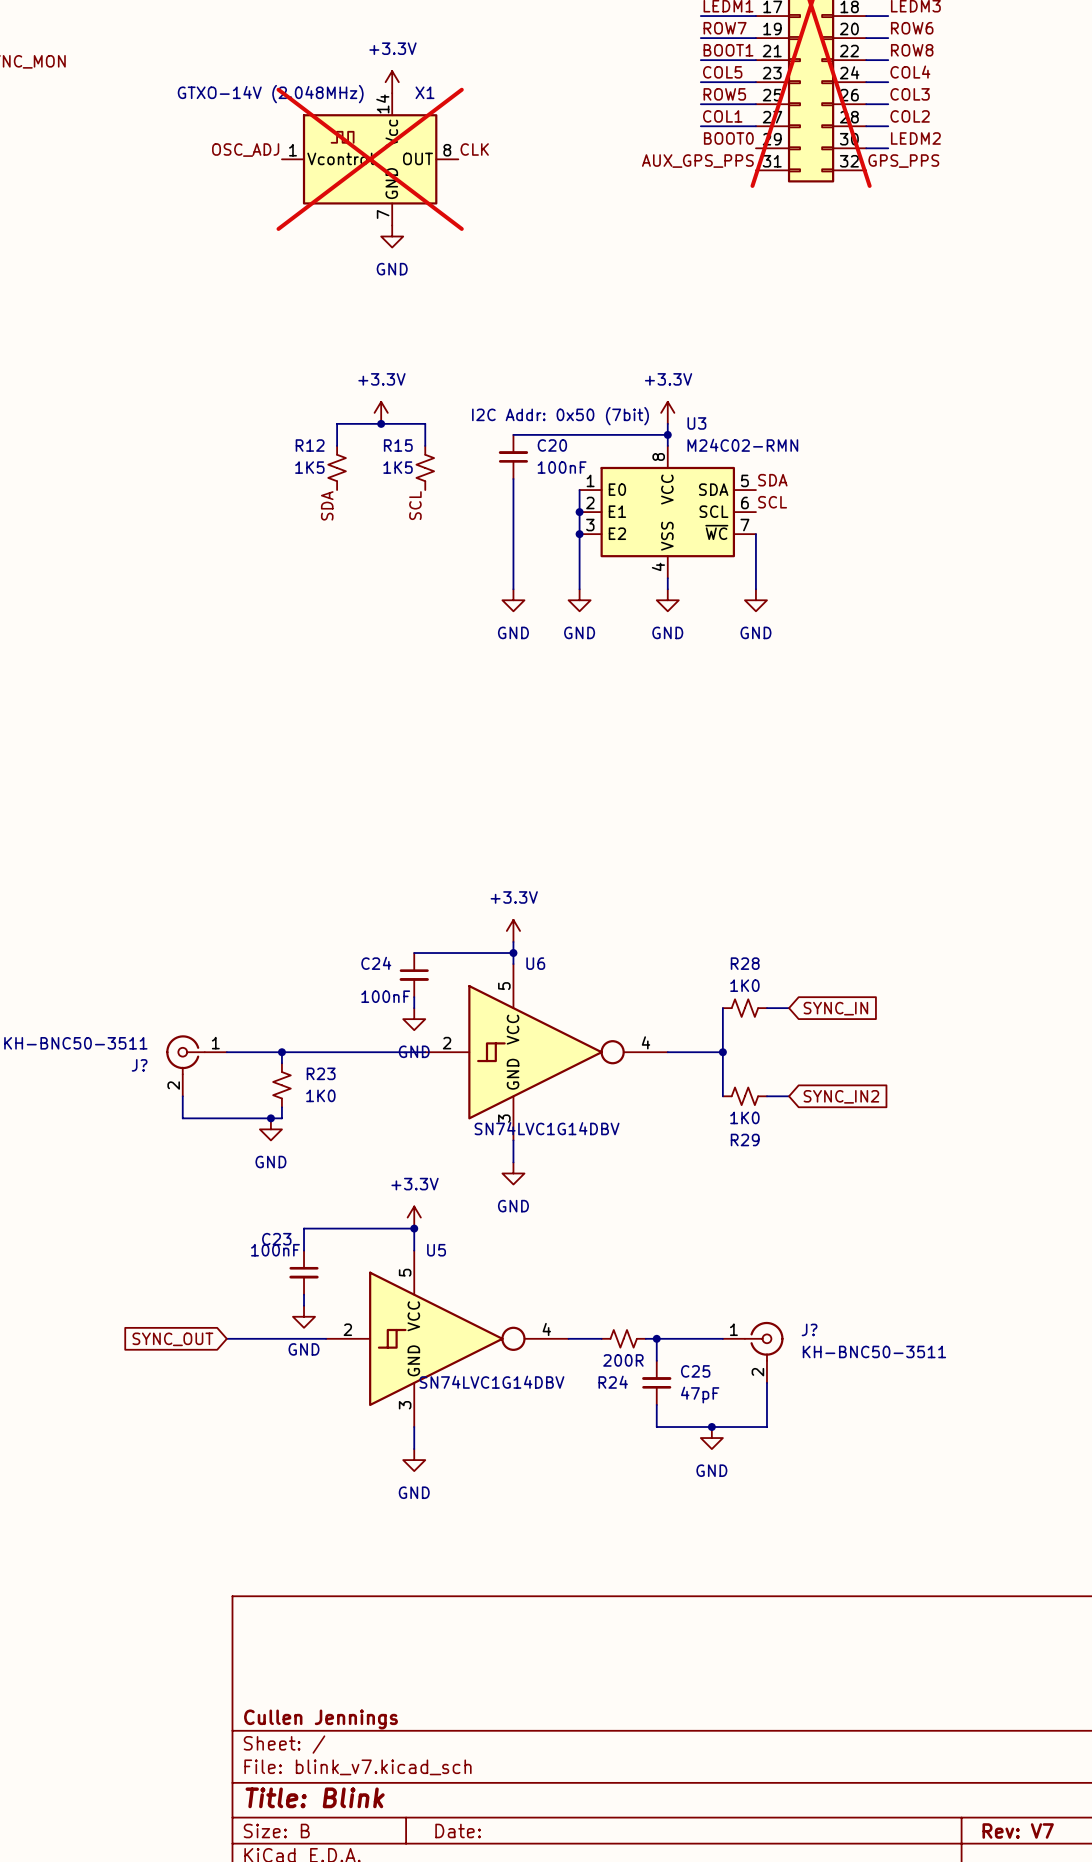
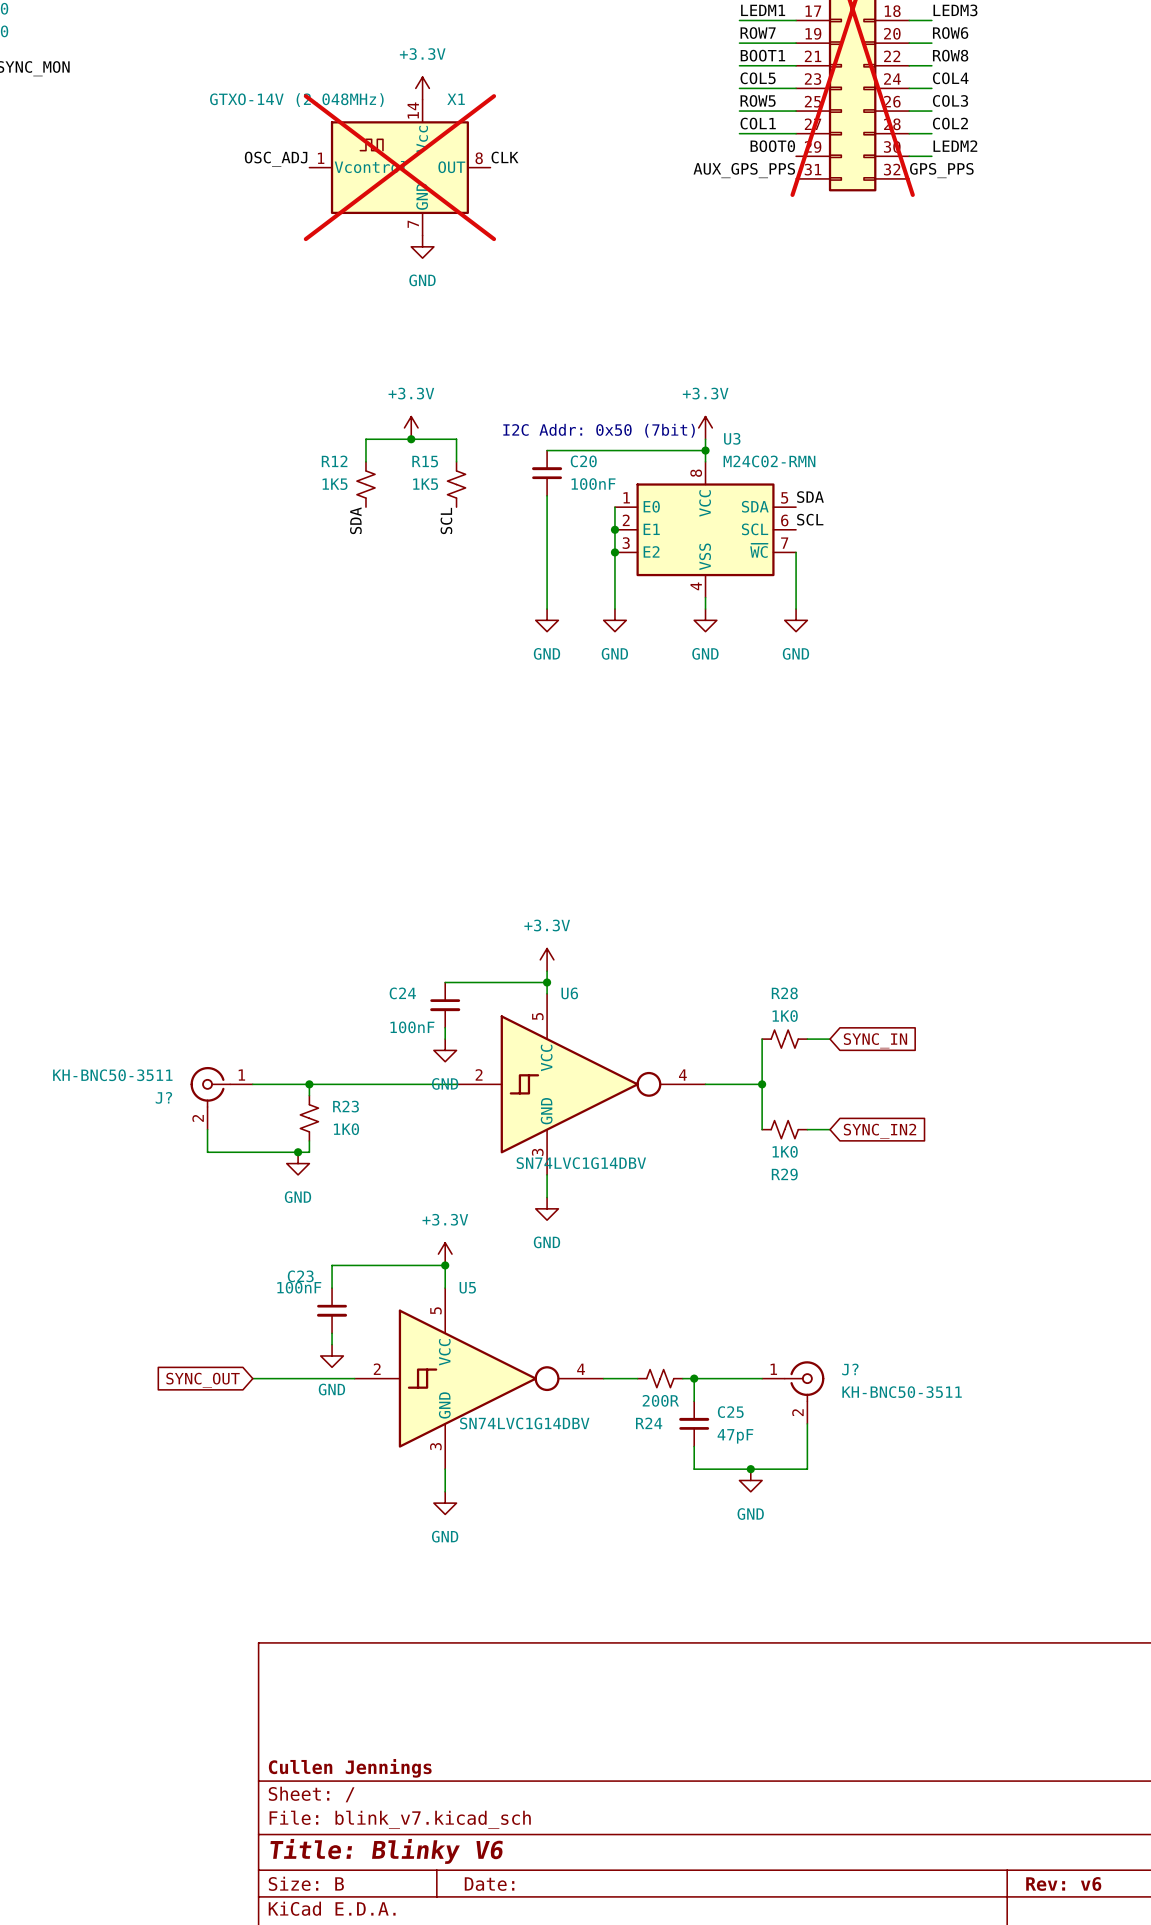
title block: Title: Blink (315, 1797) -> Title: Blinky V6 (386, 1851)
title block: Rev: V7 (1018, 1830) -> Rev: v6 (1063, 1883)

